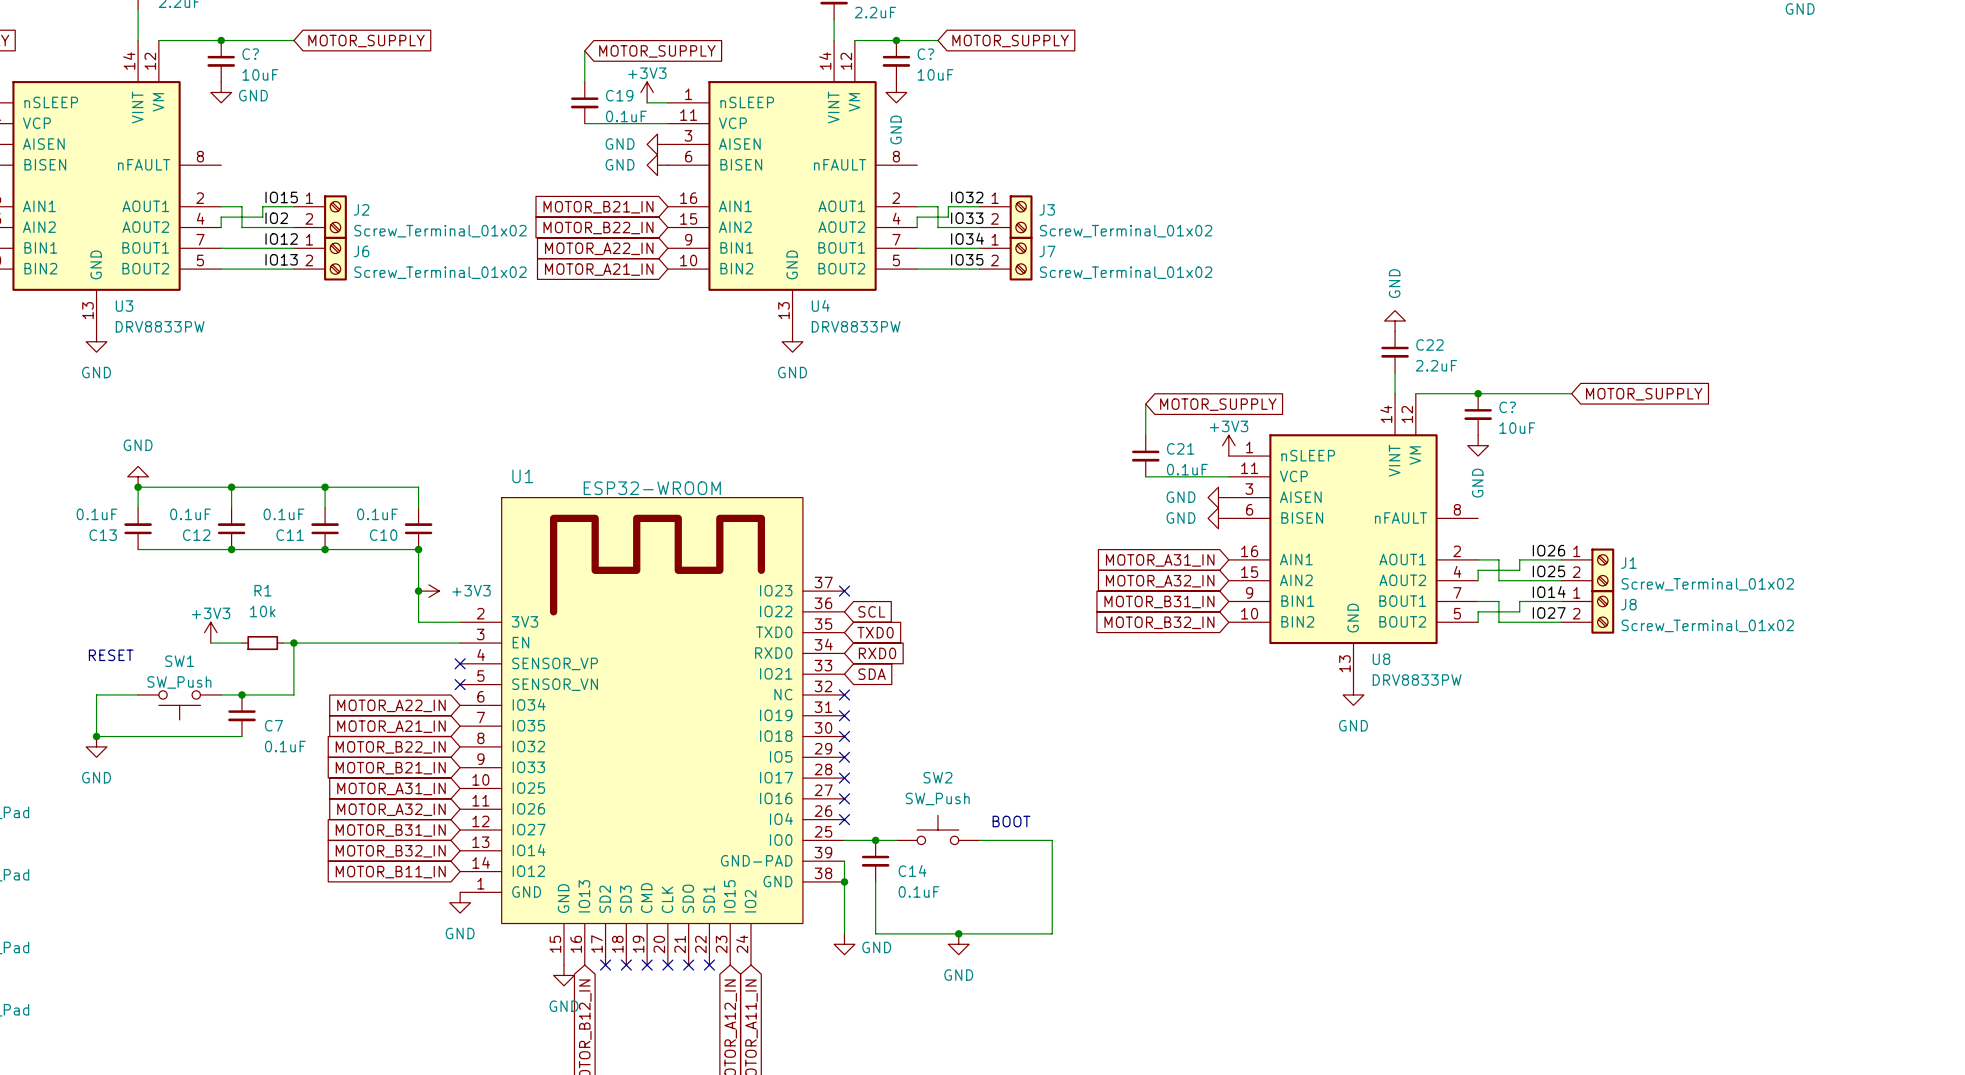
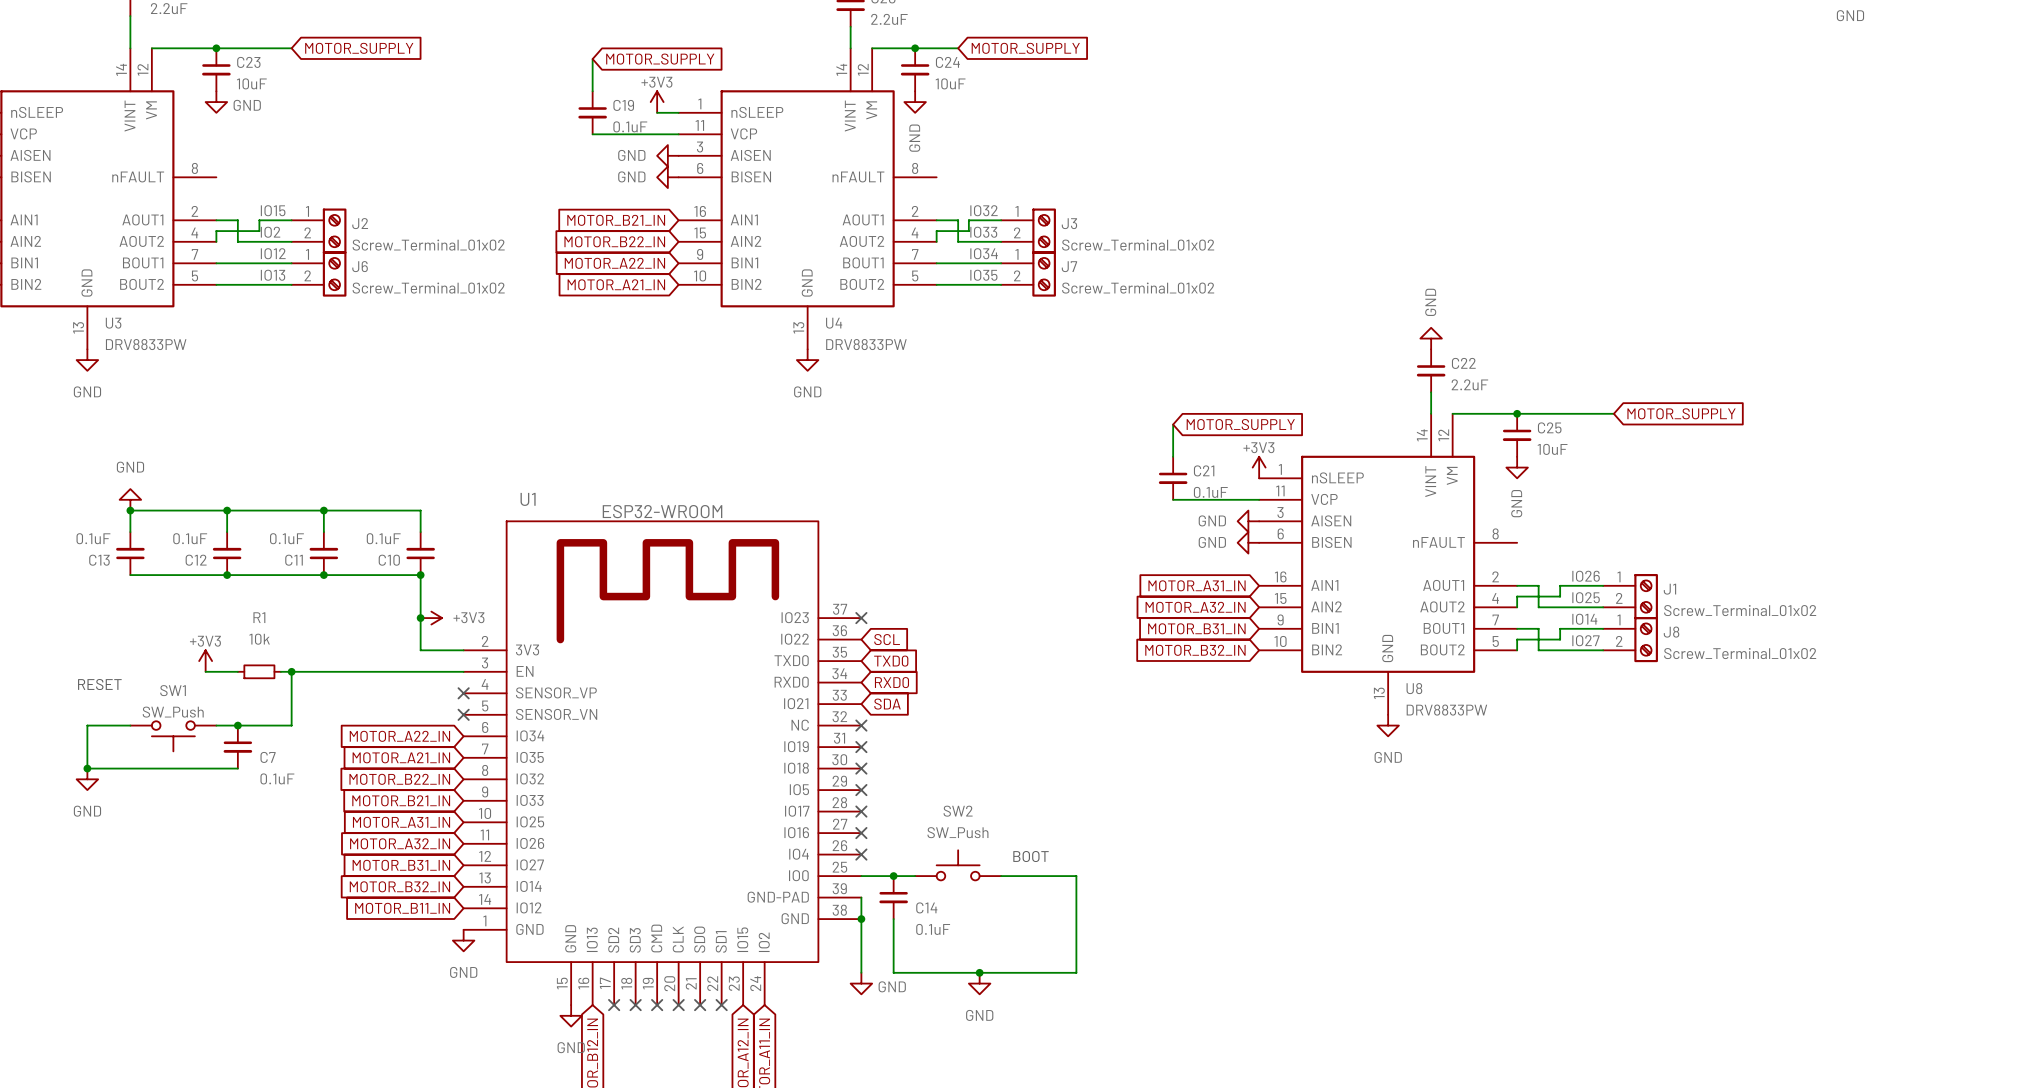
C? name: C? (250, 54) -> C23 (248, 62)
C? name: C? (925, 54) -> C24 (947, 62)
C? name: C? (1507, 407) -> C25 (1549, 427)

